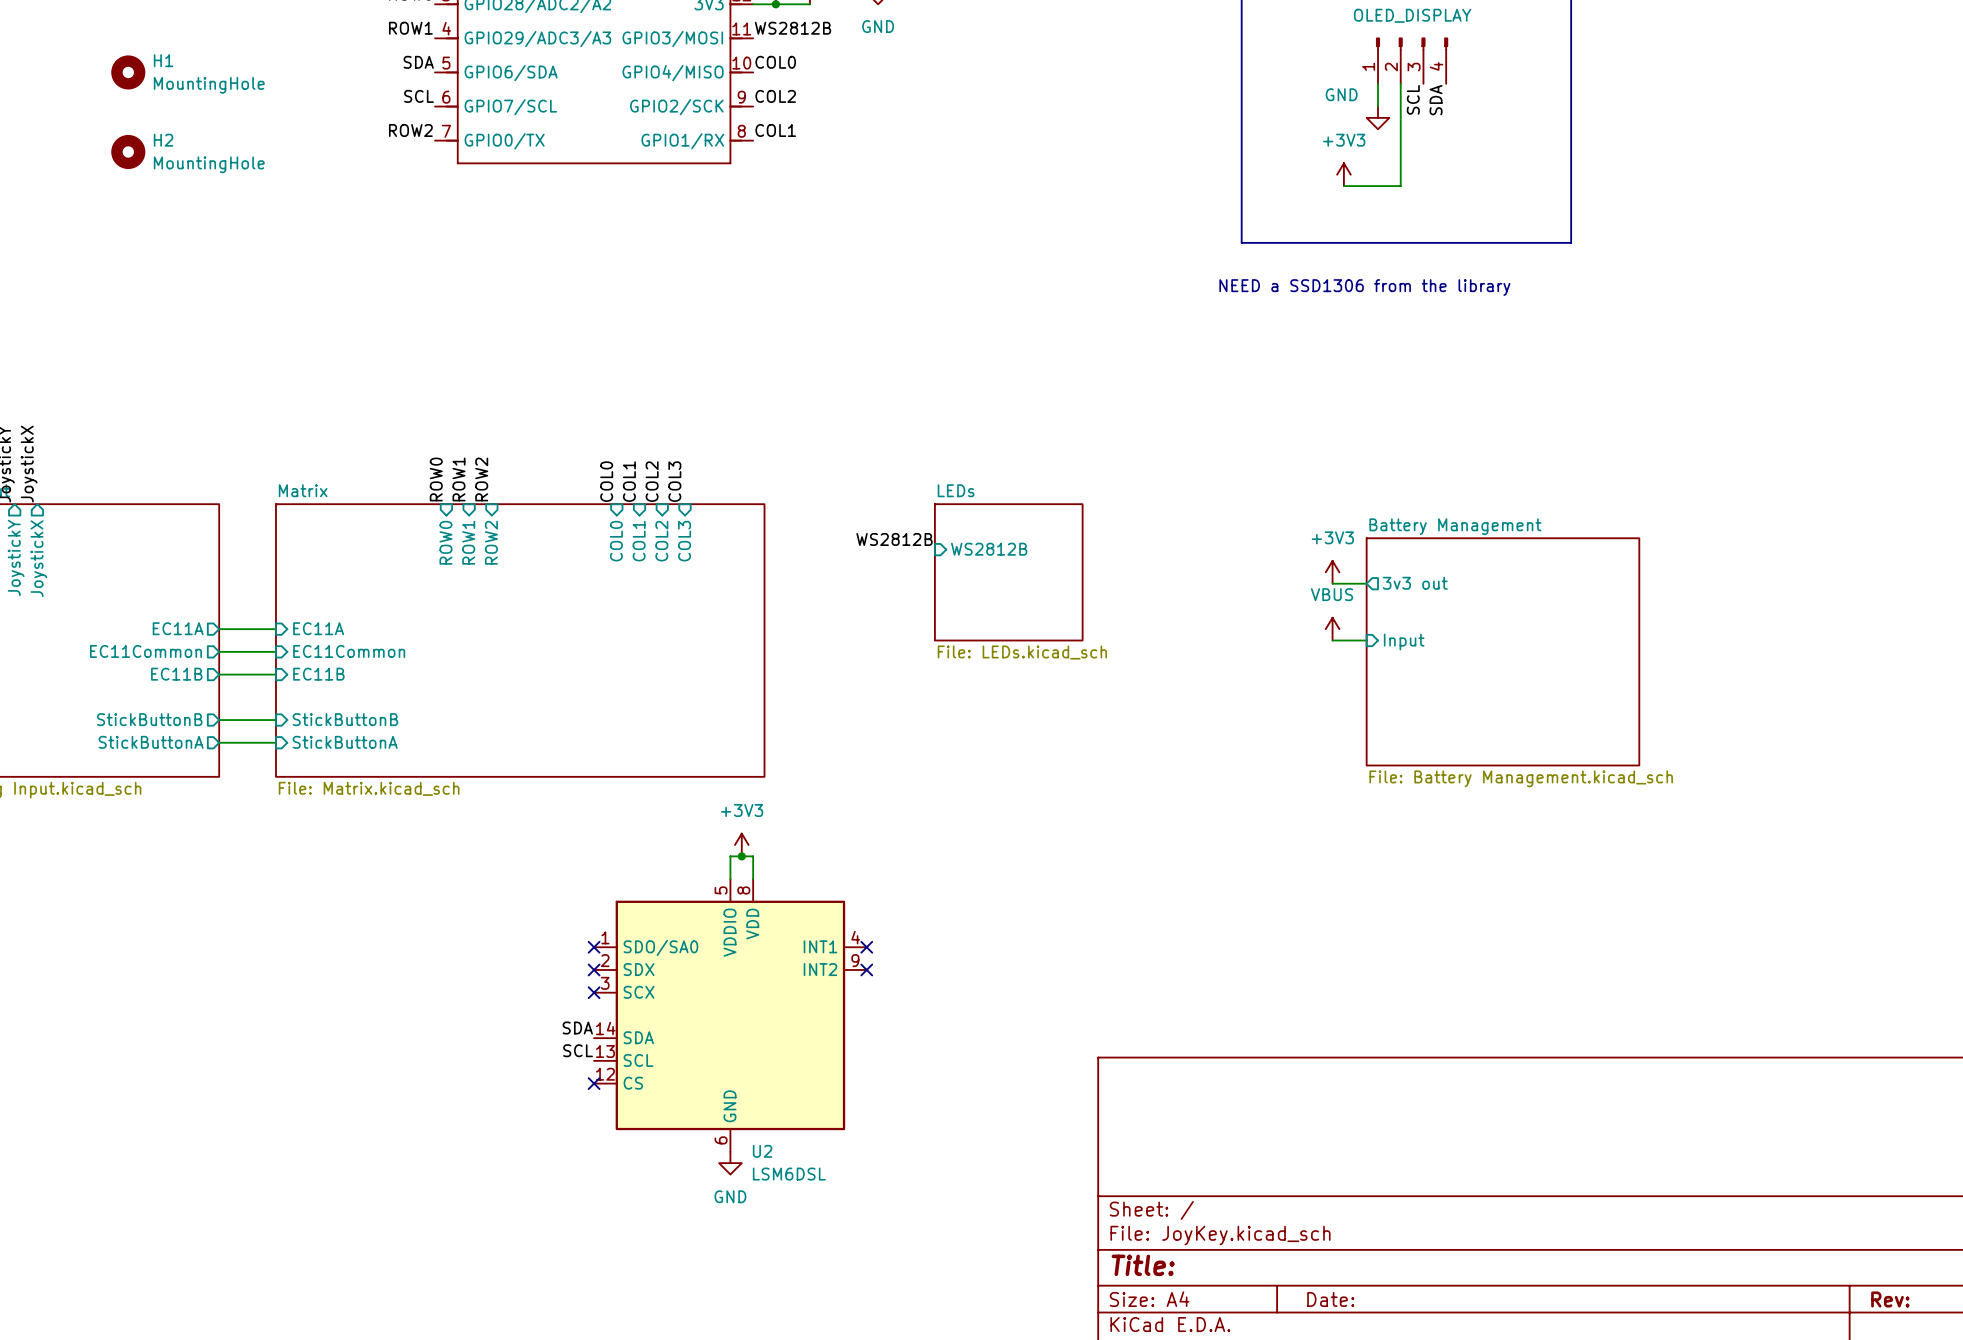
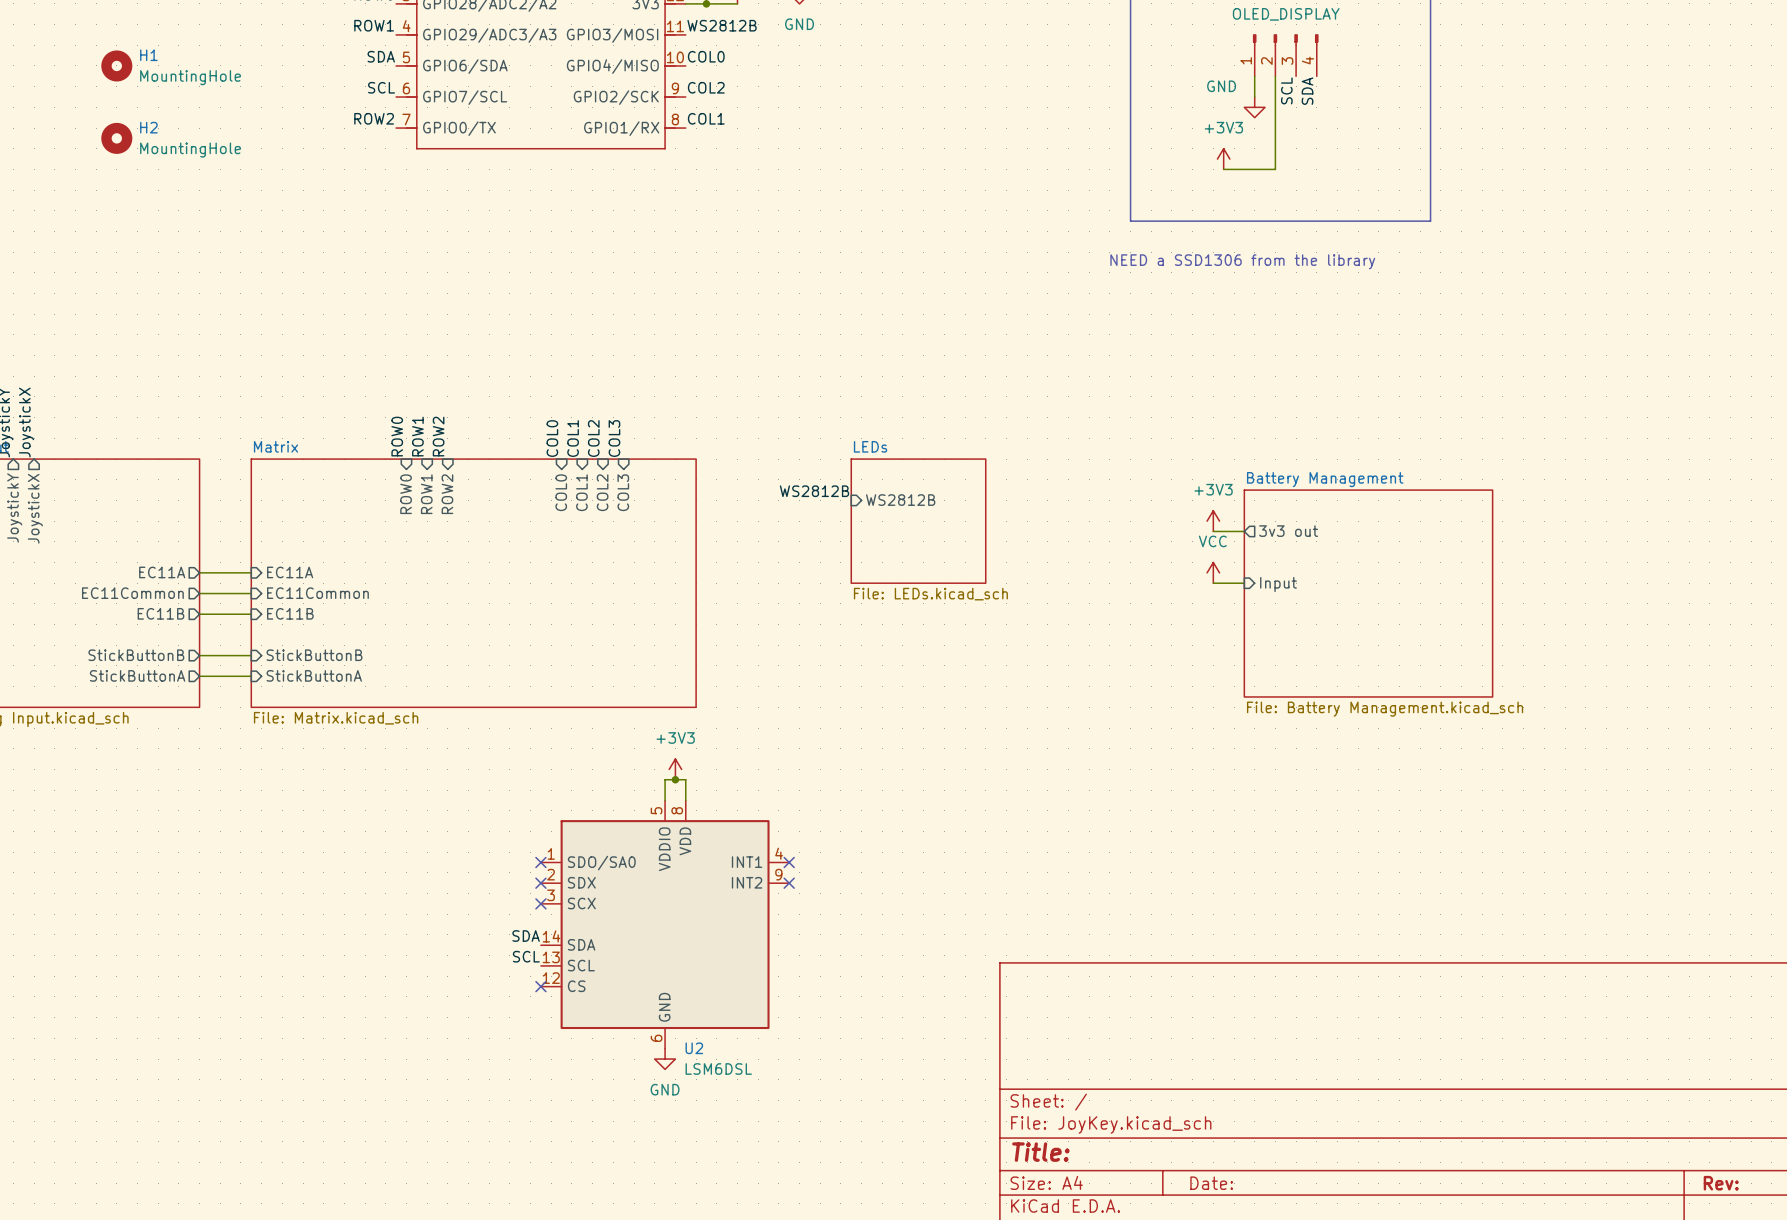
power symbol: VBUS (1332, 629) -> VCC (1213, 572)

